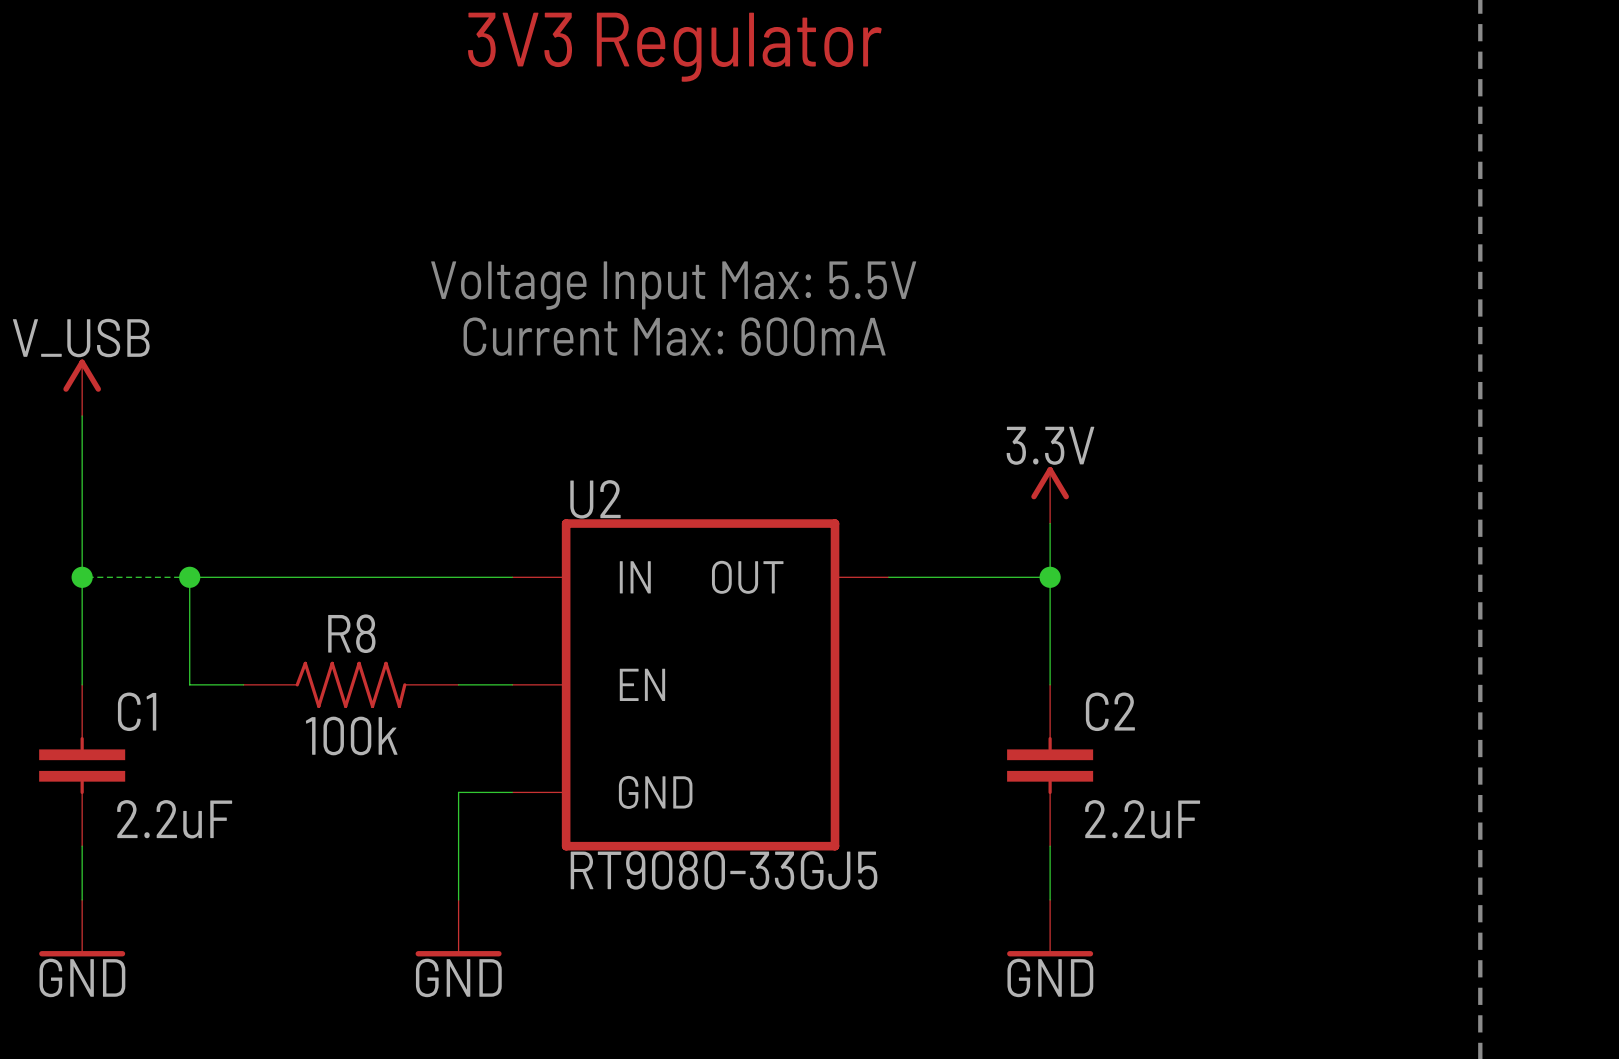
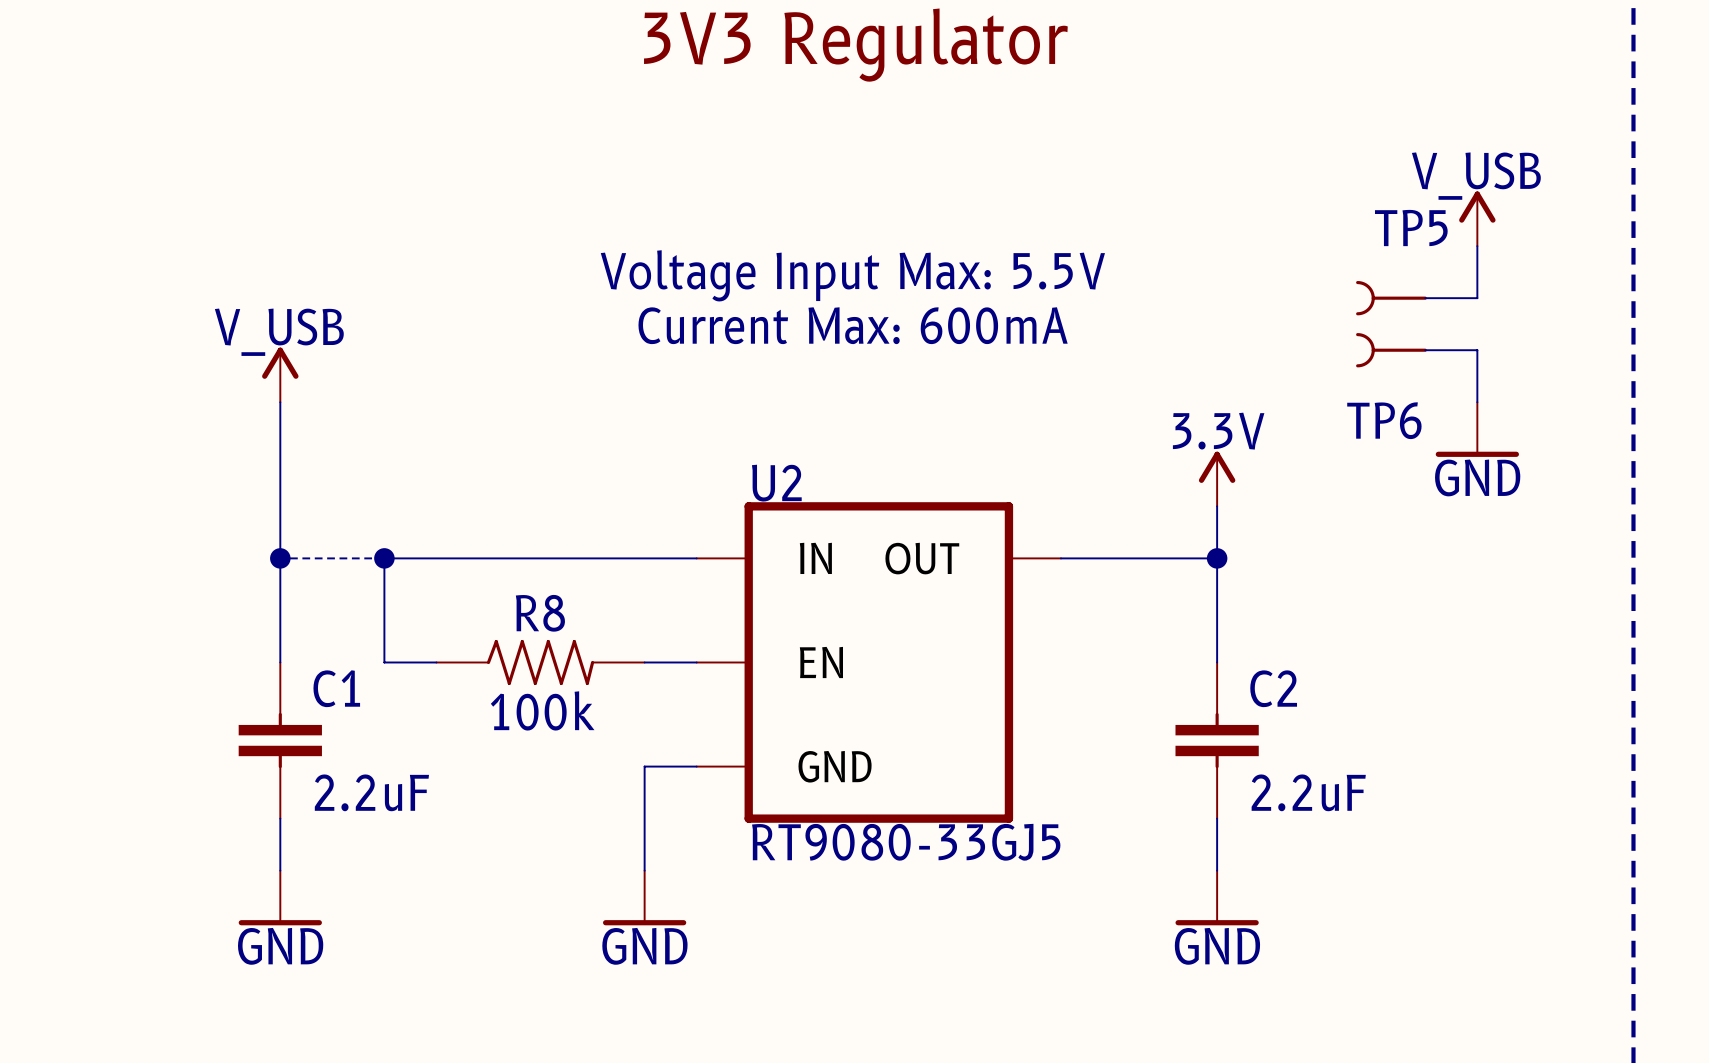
power symbol: none -> V_USB (1477, 218)
wire: none -> (1477, 246) (1477, 298) (1425, 298)
TP5: none -> (1391, 298)
TP6: none -> (1391, 350)
wire: none -> (1425, 350) (1477, 350) (1477, 402)
power symbol: none -> GND (1477, 429)

